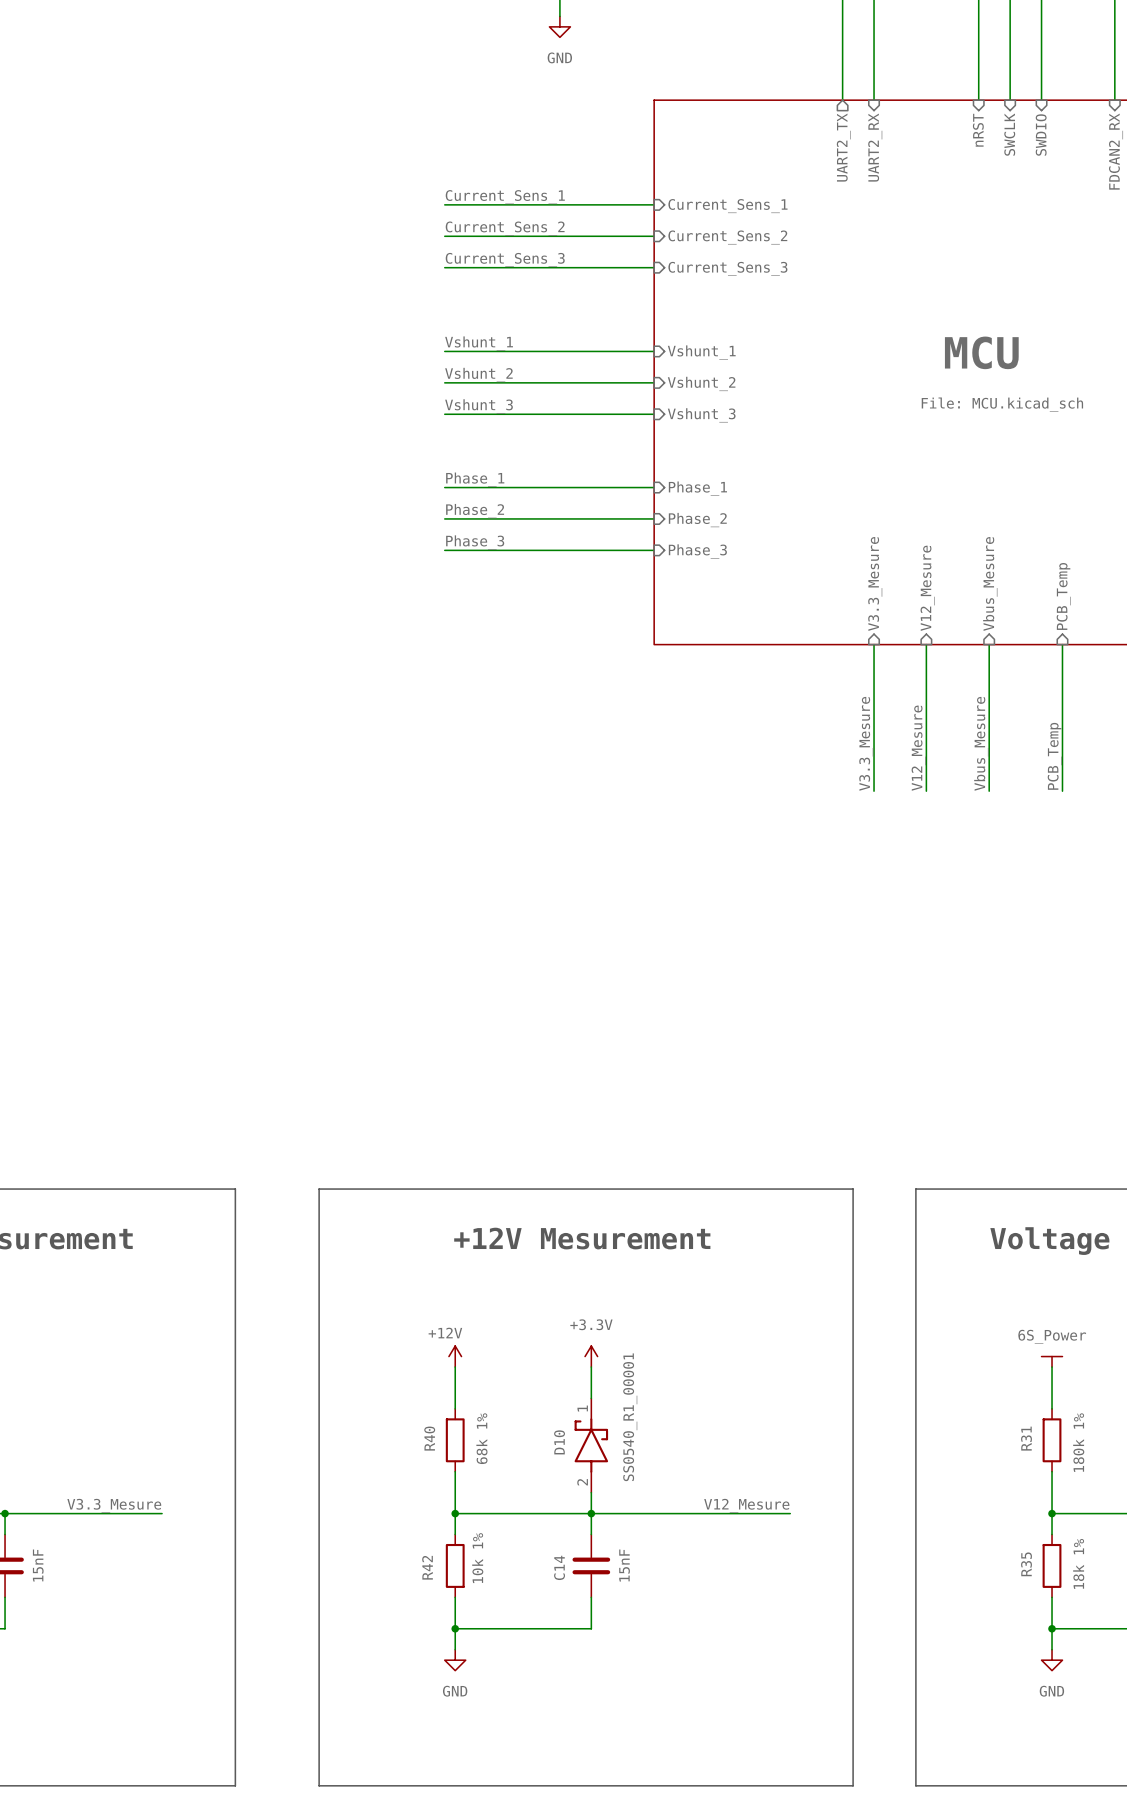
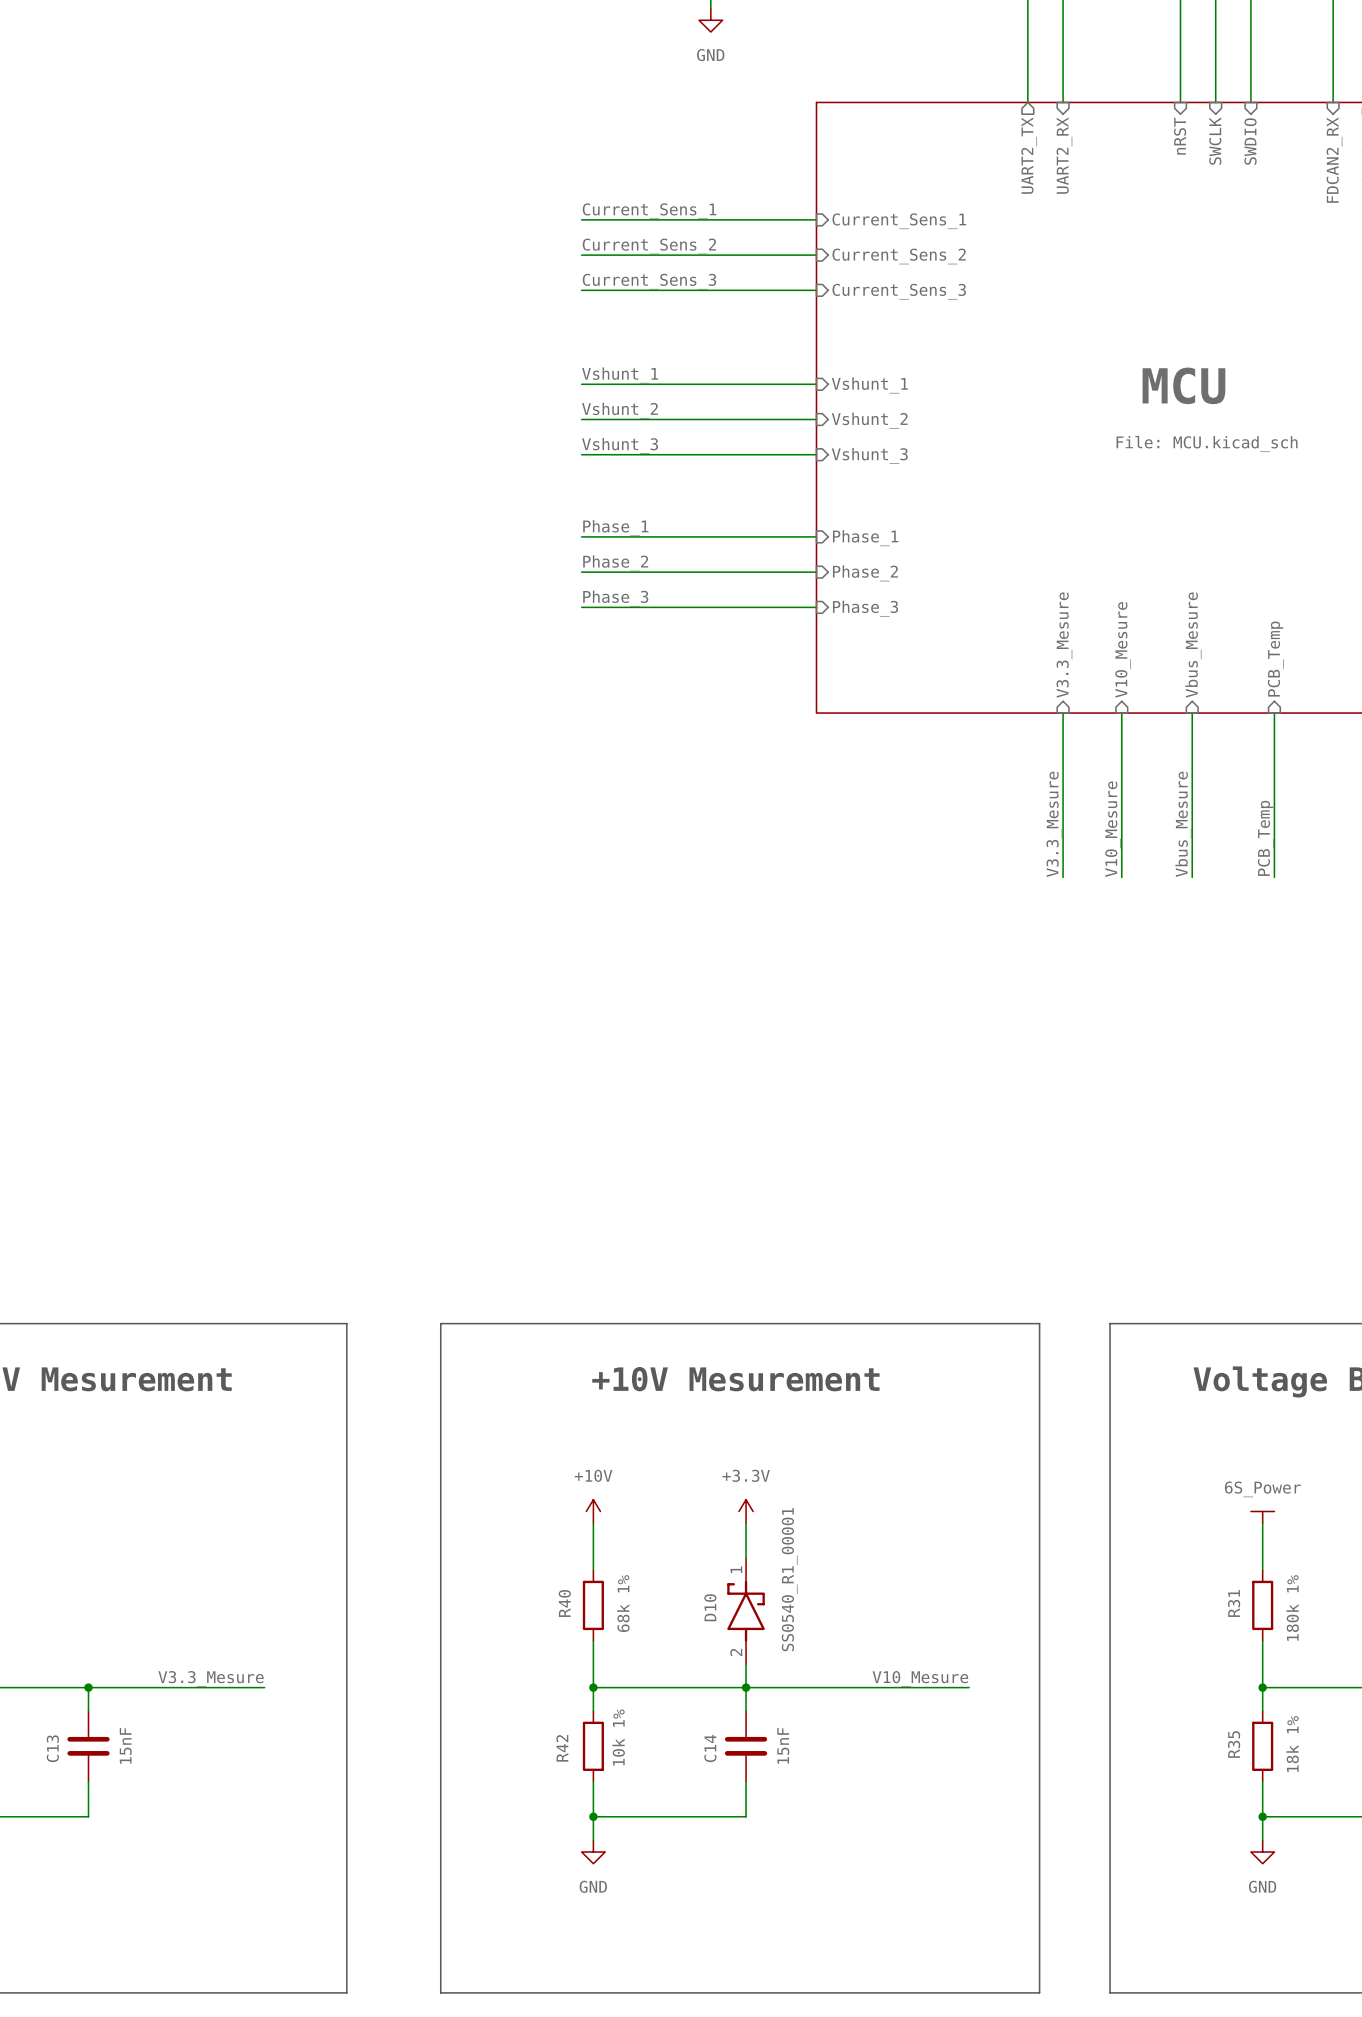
sheet pin: V12_Mesure (927, 588) -> V10_Mesure (1123, 649)
label: V12_Mesure (918, 748) -> V10_Mesure (1113, 829)
text: +12V Mesurement (582, 1238) -> +10V Mesurement (735, 1379)
power symbol: +12V (455, 1356) -> +10V (593, 1511)
label: V12_Mesure (746, 1505) -> V10_Mesure (920, 1678)

